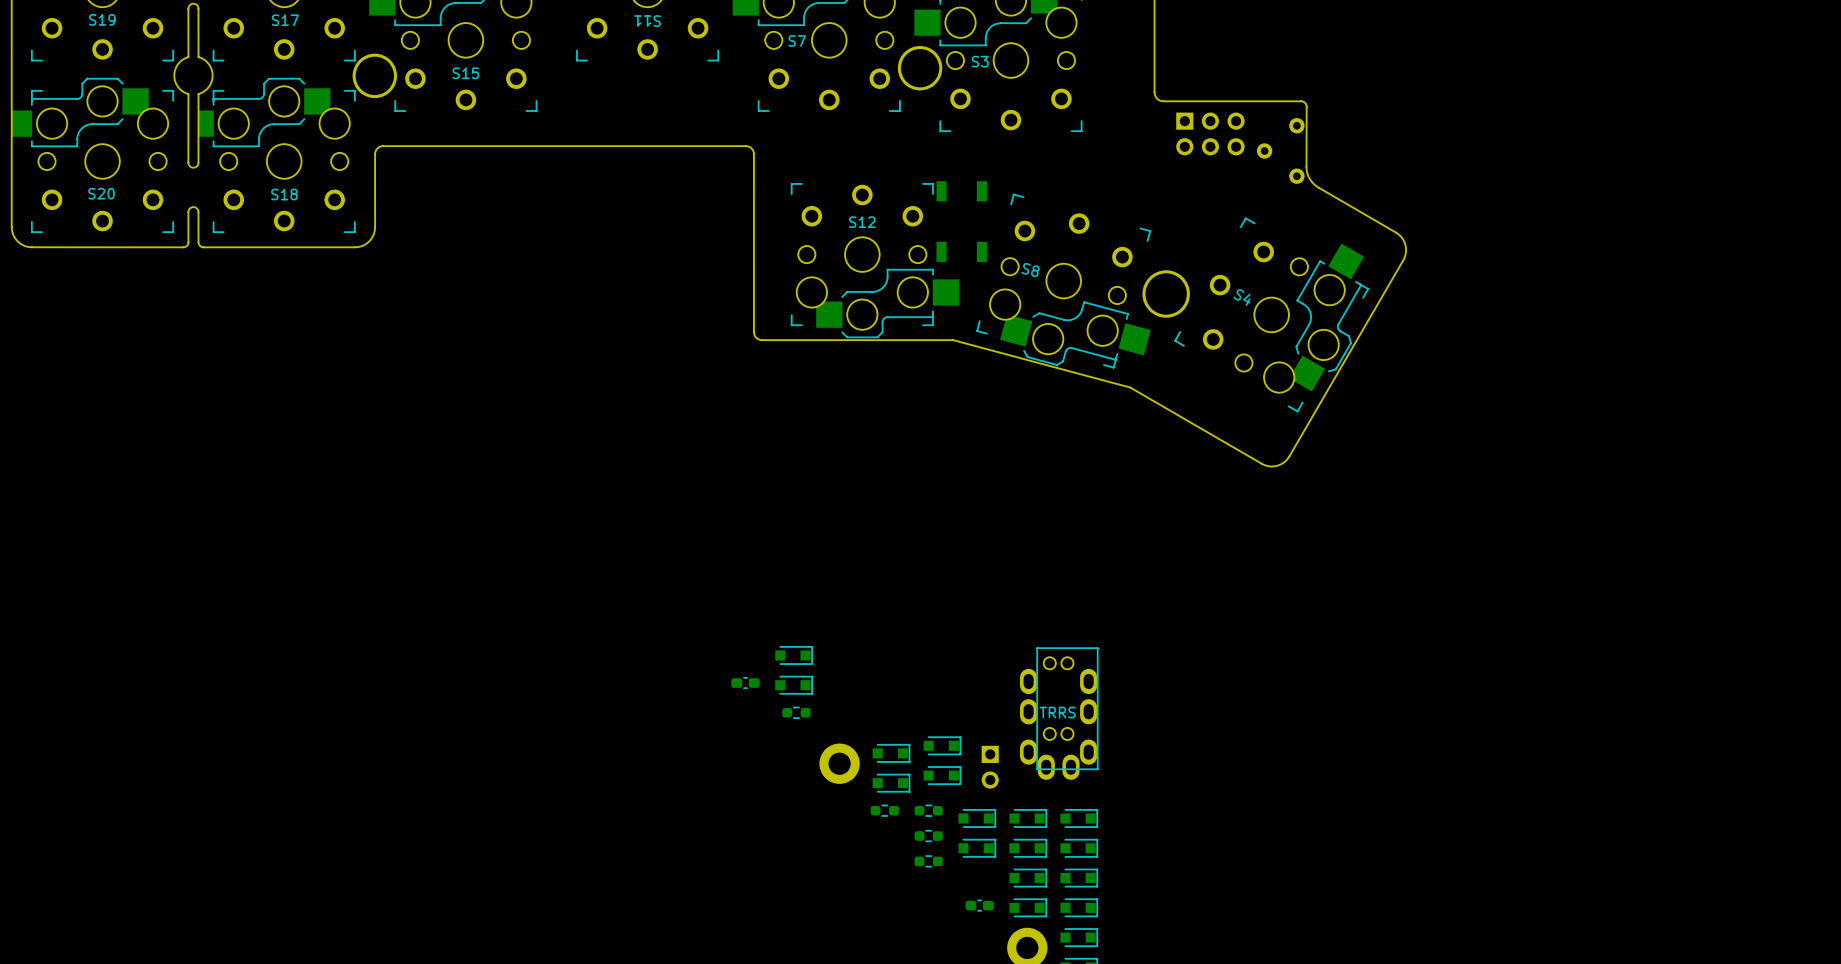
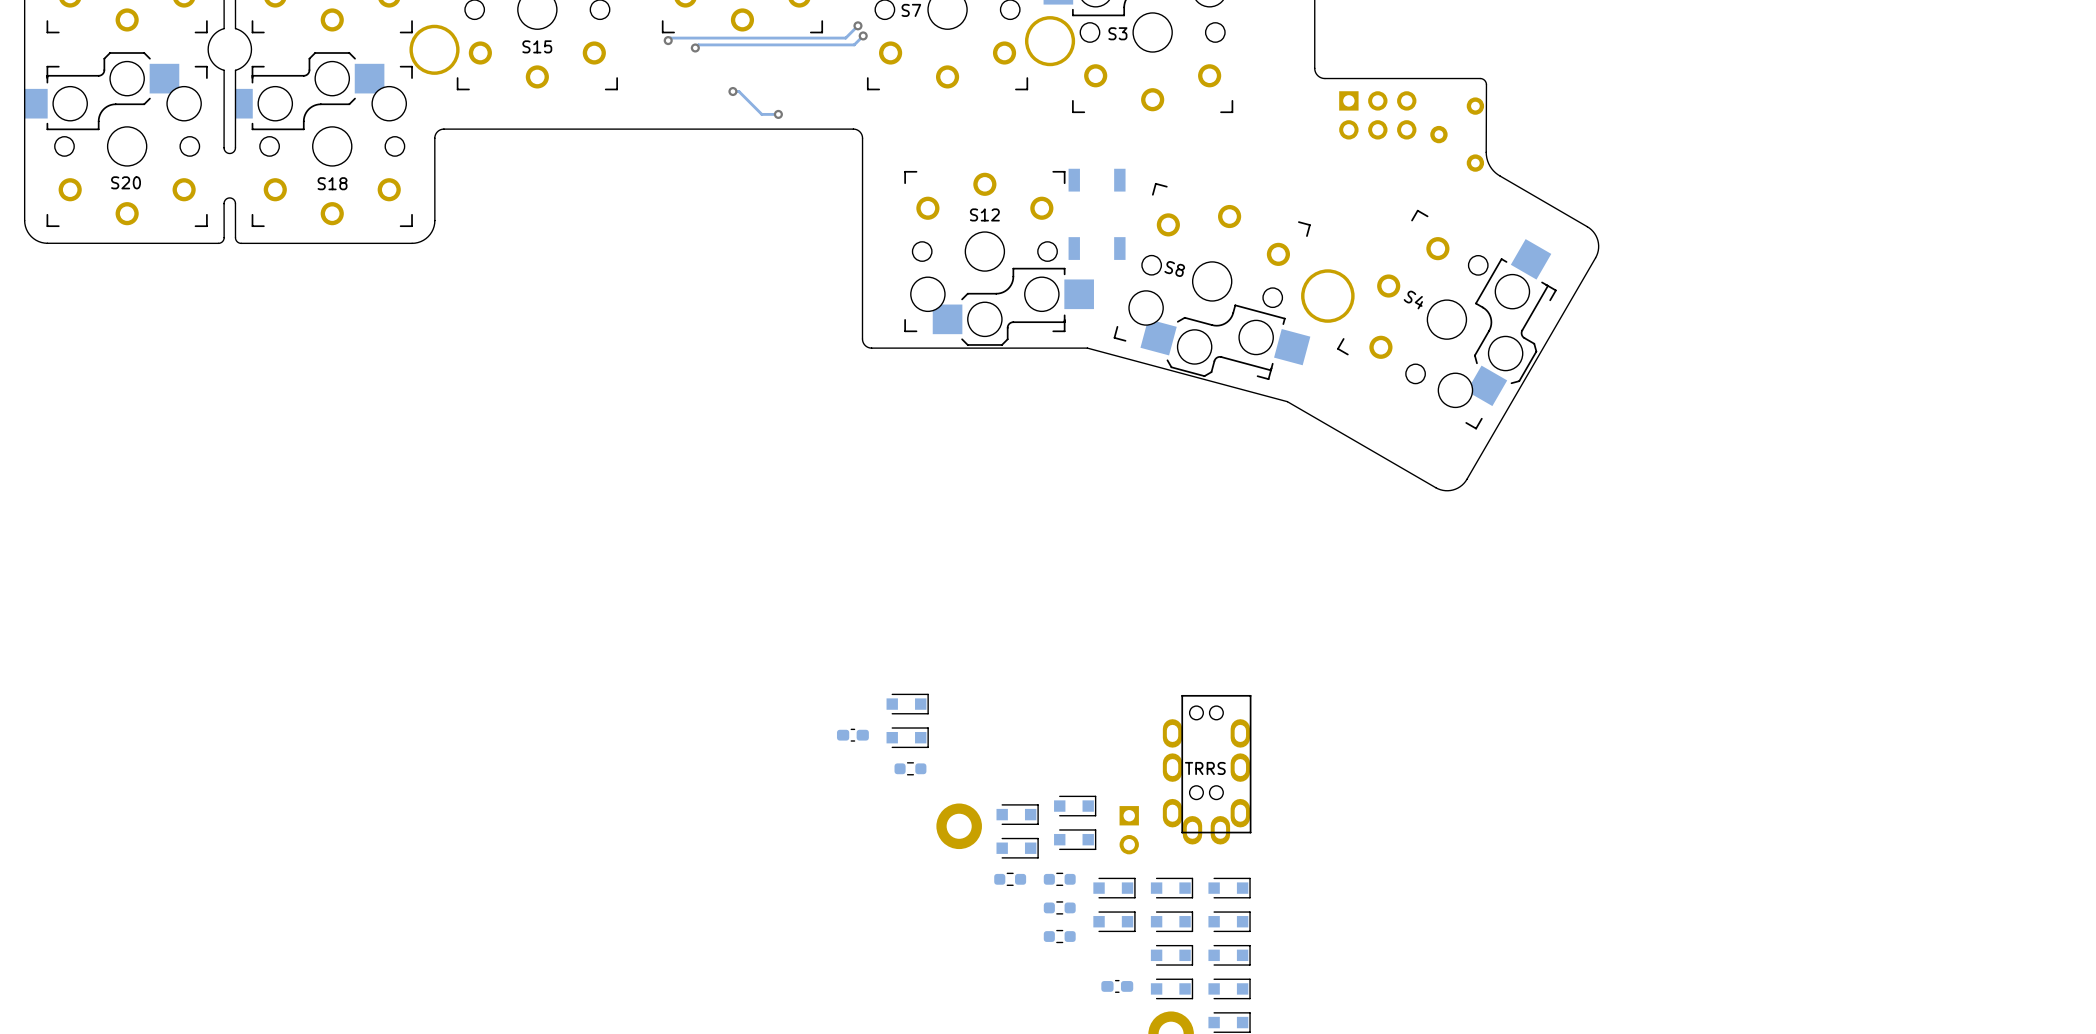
track: none -> (857, 25) (845, 38) (670, 38) (668, 40)
via: none -> (857, 25)
track: none -> (863, 35) (854, 44) (698, 44) (695, 47)
via: none -> (863, 35)
via: none -> (668, 40)
via: none -> (695, 47)
track: none -> (732, 91) (738, 91) (761, 114) (778, 114)
via: none -> (732, 91)
via: none -> (778, 114)

